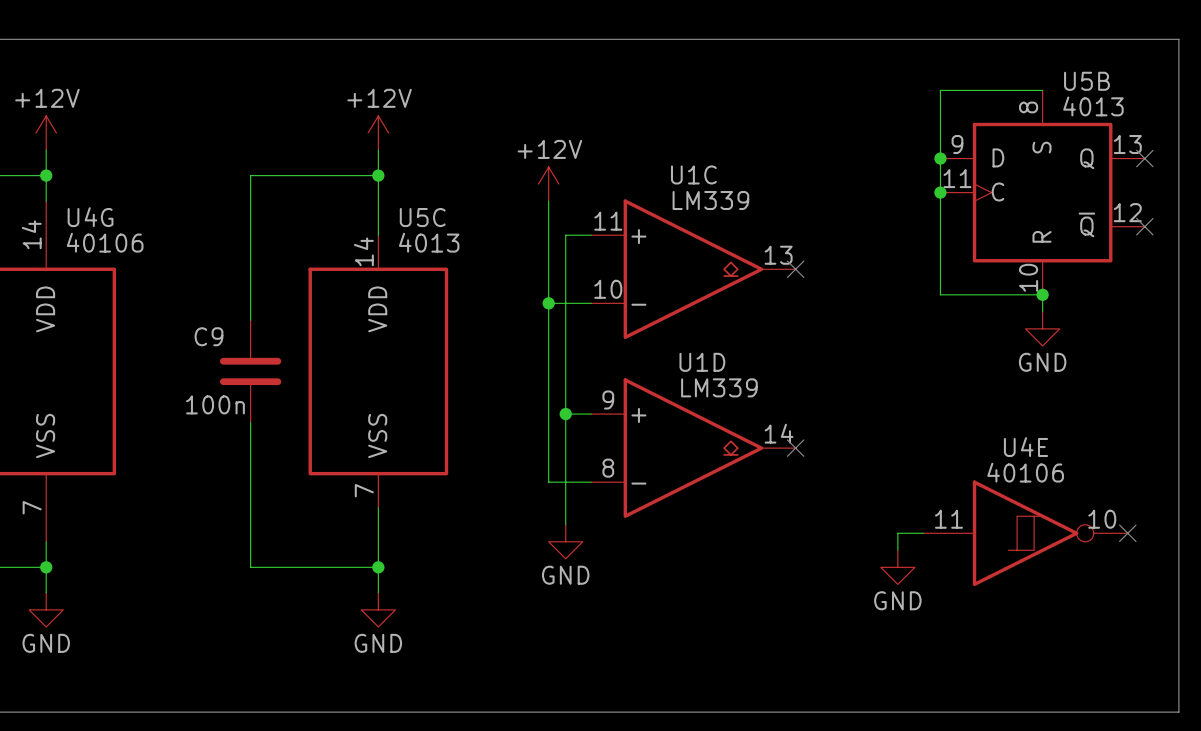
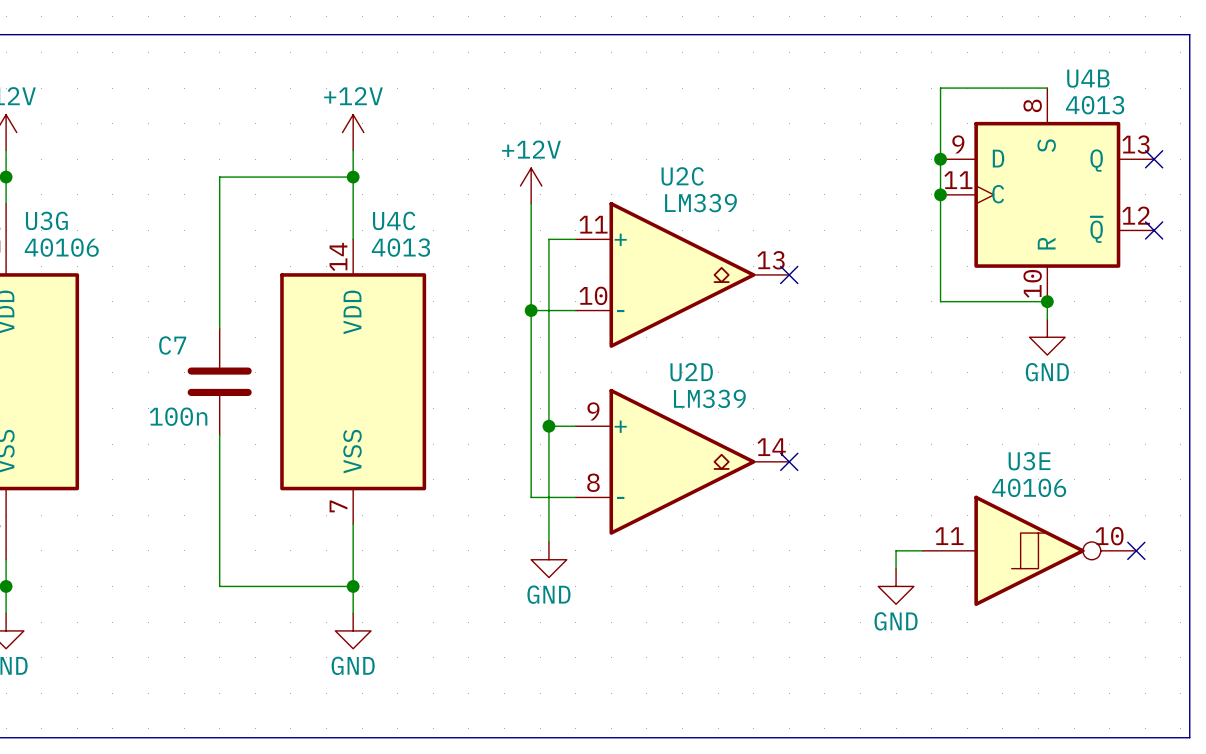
U5B name: U5B (1086, 81) -> U4B (1088, 78)
U1C name: U1C (693, 174) -> U2C (682, 176)
U4G name: U4G (90, 217) -> U3G (46, 220)
U5C name: U5C (422, 217) -> U4C (394, 220)
C9 name: C9 (208, 336) -> C7 (172, 345)
U1D name: U1D (702, 362) -> U2D (691, 372)
U4E name: U4E (1026, 447) -> U3E (1029, 461)

